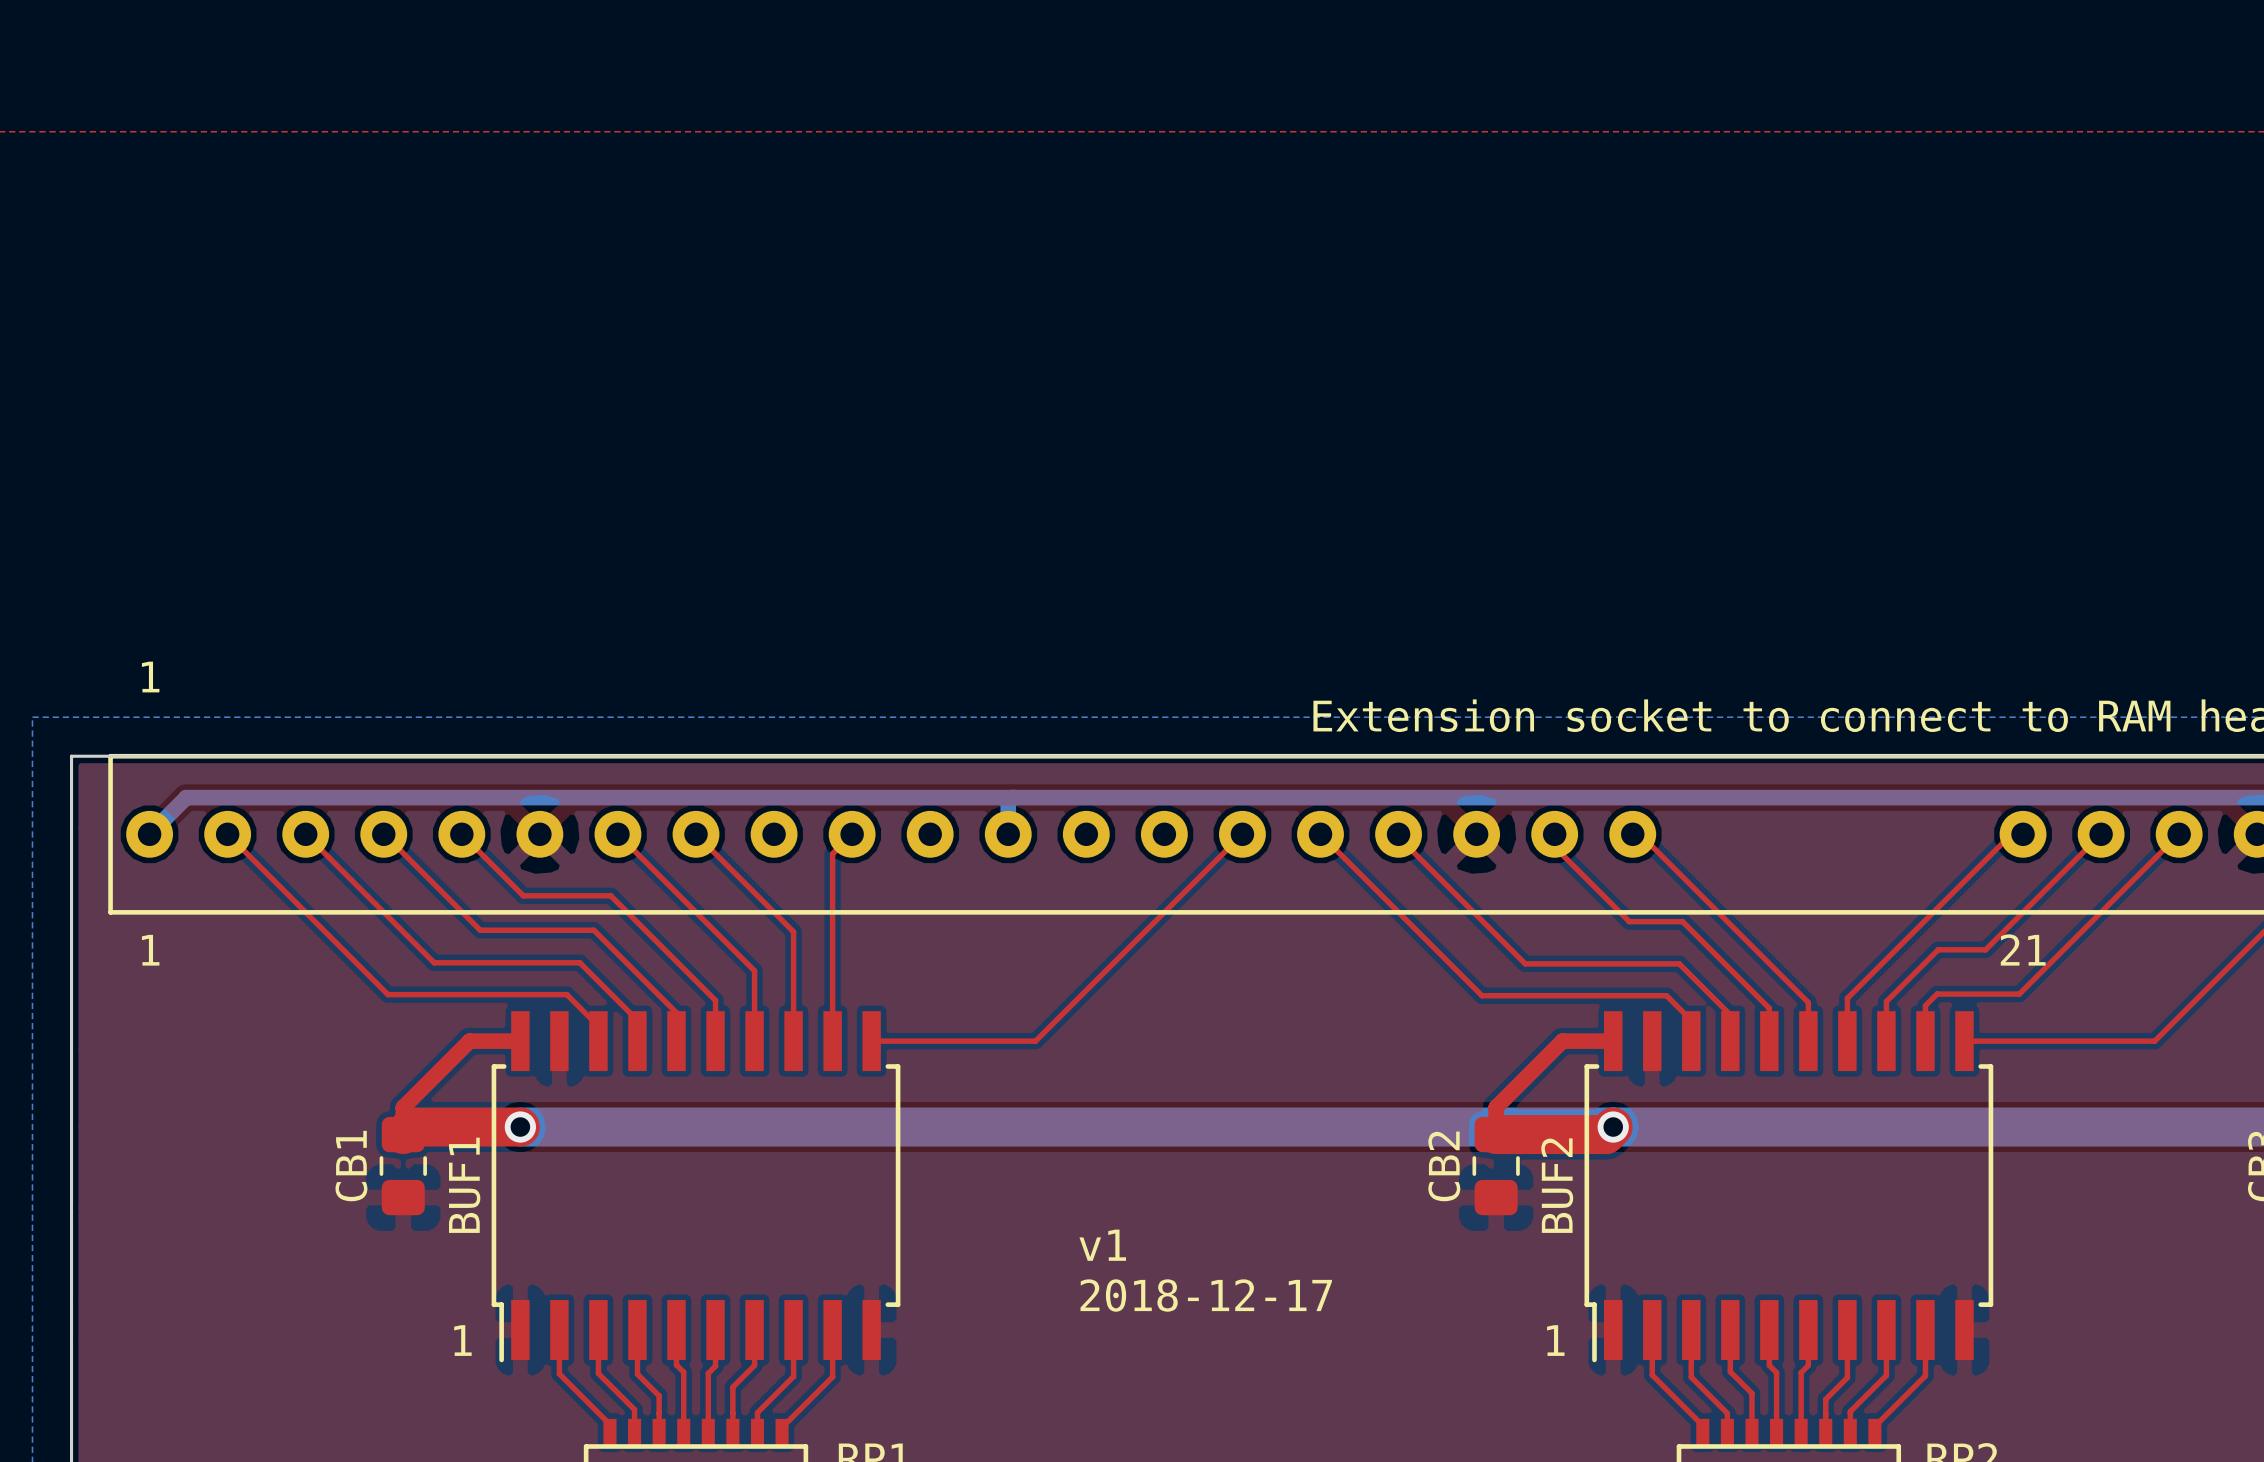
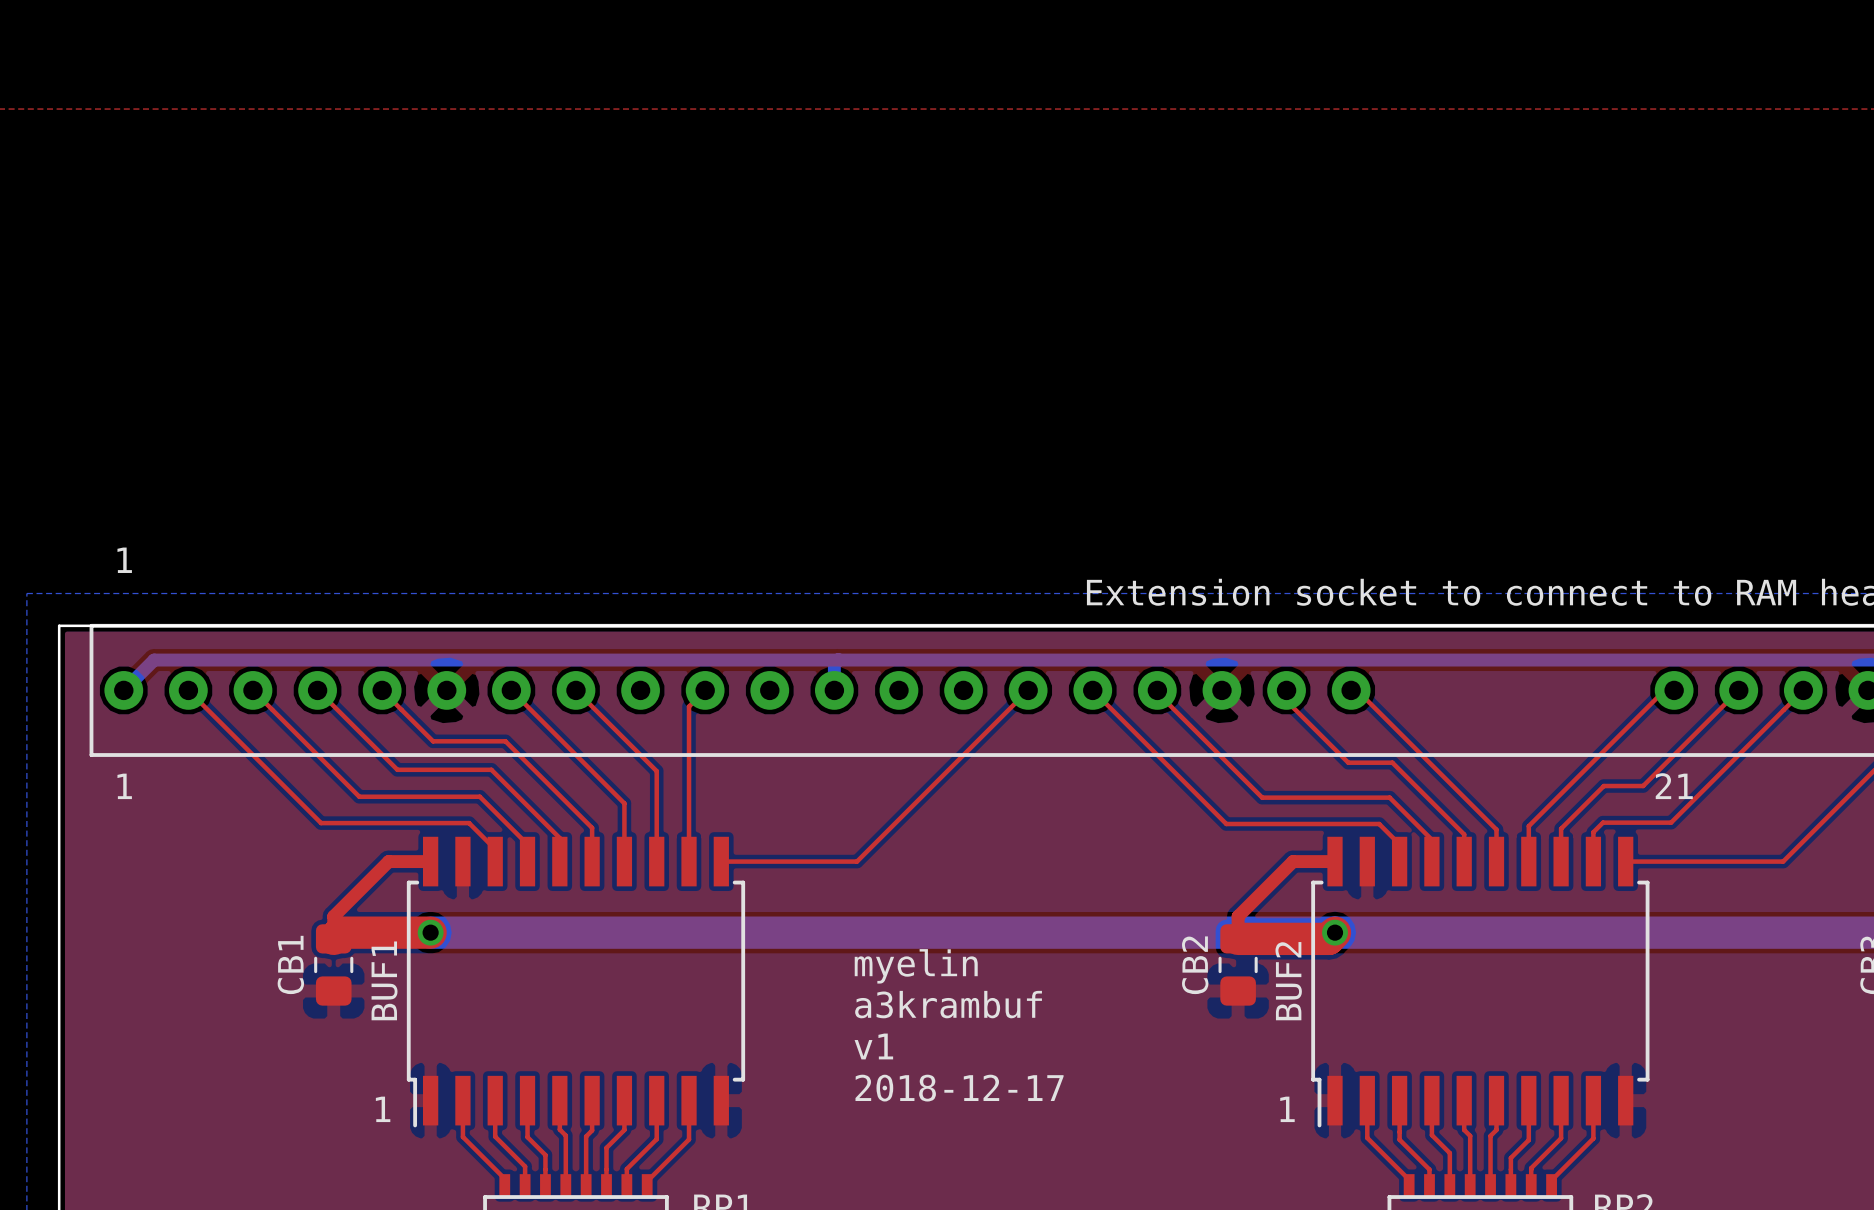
text: none -> myelin (916, 966)
text: none -> a3krambuf (948, 1004)
text position: v1 (1102, 1245) -> v1 (873, 1046)
text position: 2018-12-17 (1206, 1295) -> 2018-12-17 (959, 1088)

